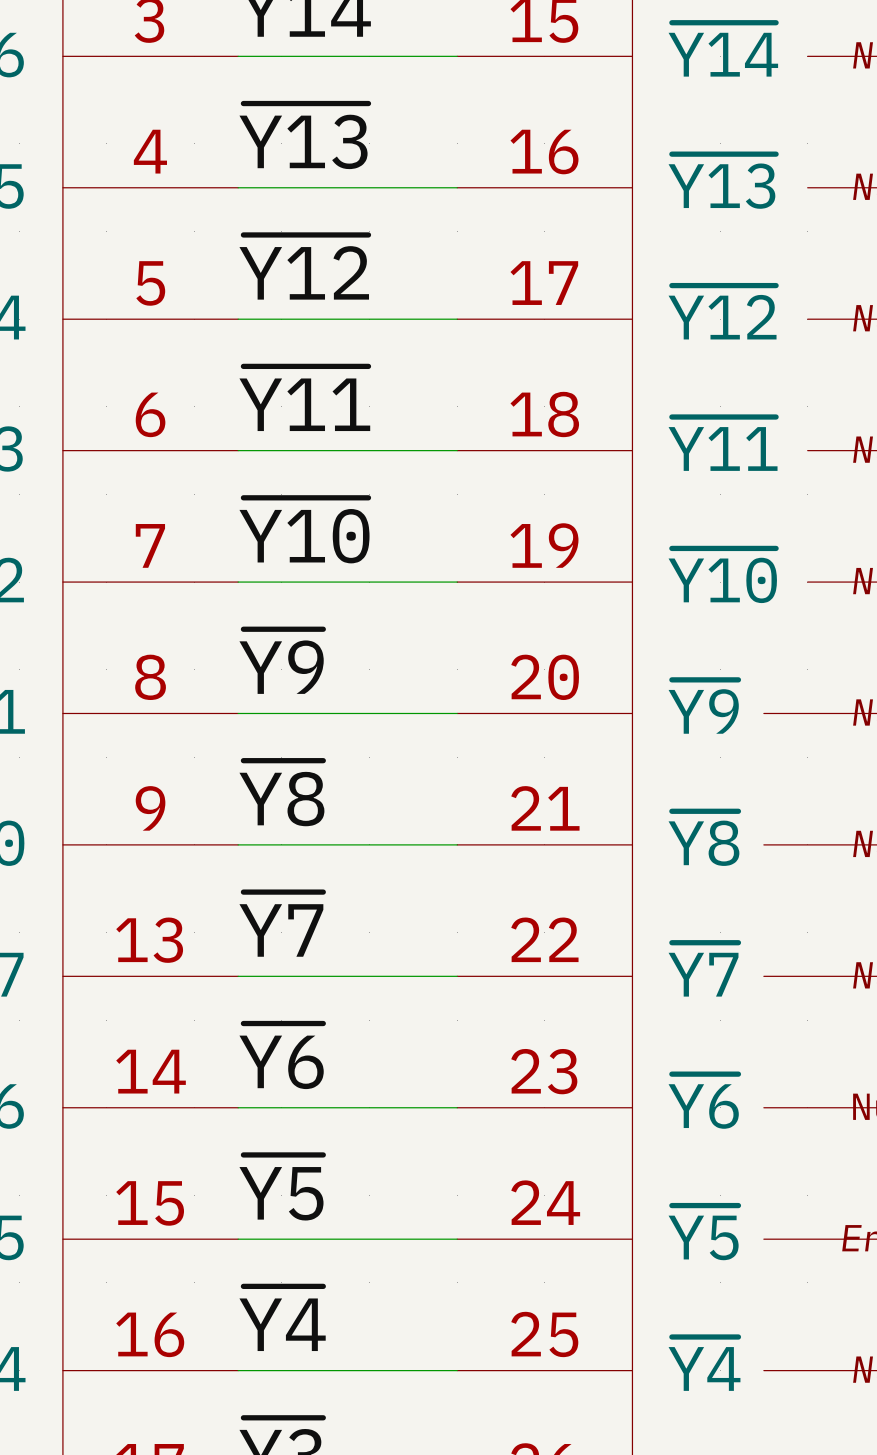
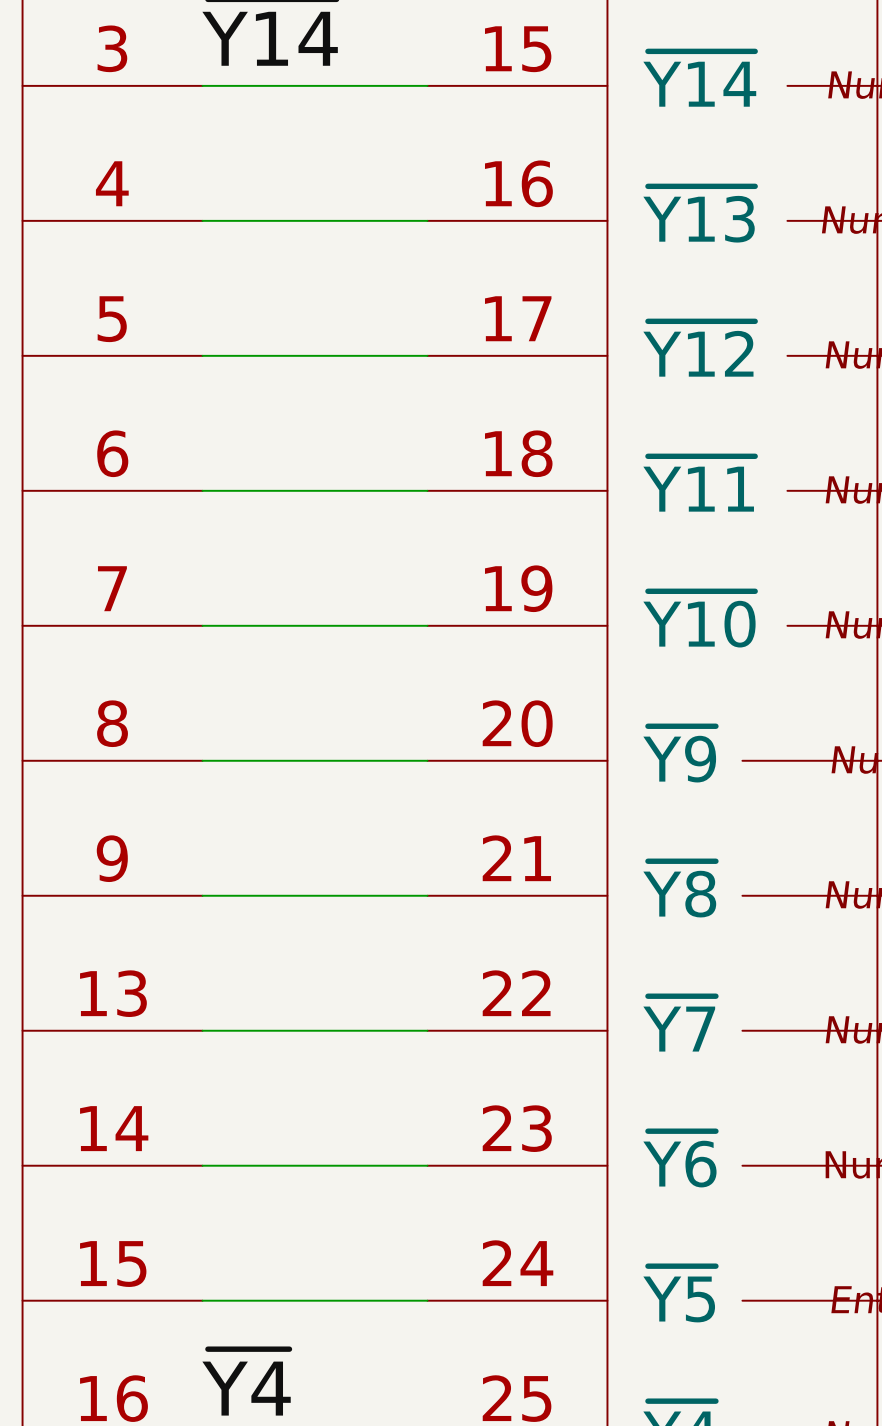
label: ~{Y13} (303, 136) -> none
label: ~{Y12} (304, 267) -> none
label: ~{Y11} (304, 398) -> none
label: ~{Y10} (304, 530) -> none
label: ~{Y9} (281, 661) -> none
label: ~{Y8} (281, 793) -> none
label: ~{Y7} (281, 924) -> none
label: ~{Y6} (281, 1056) -> none
label: ~{Y5} (281, 1187) -> none

